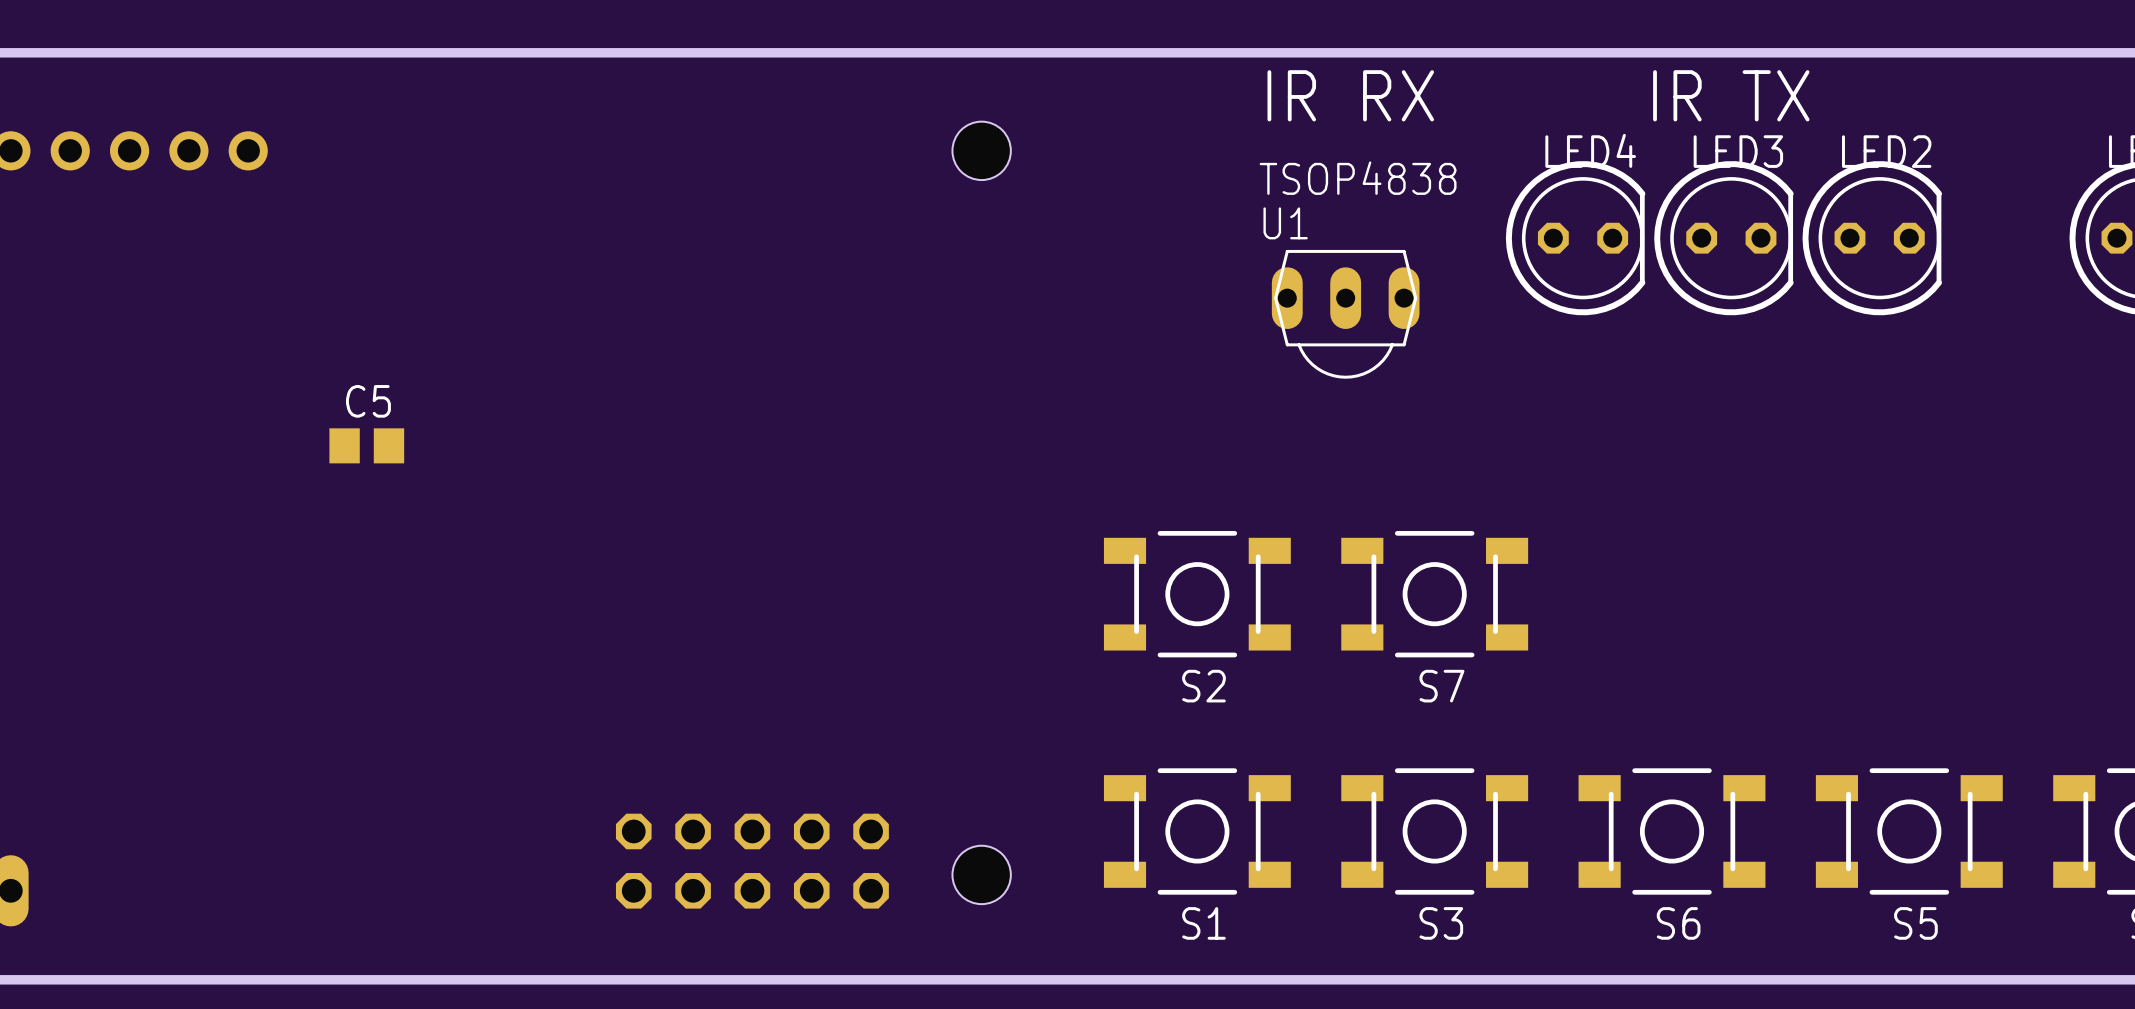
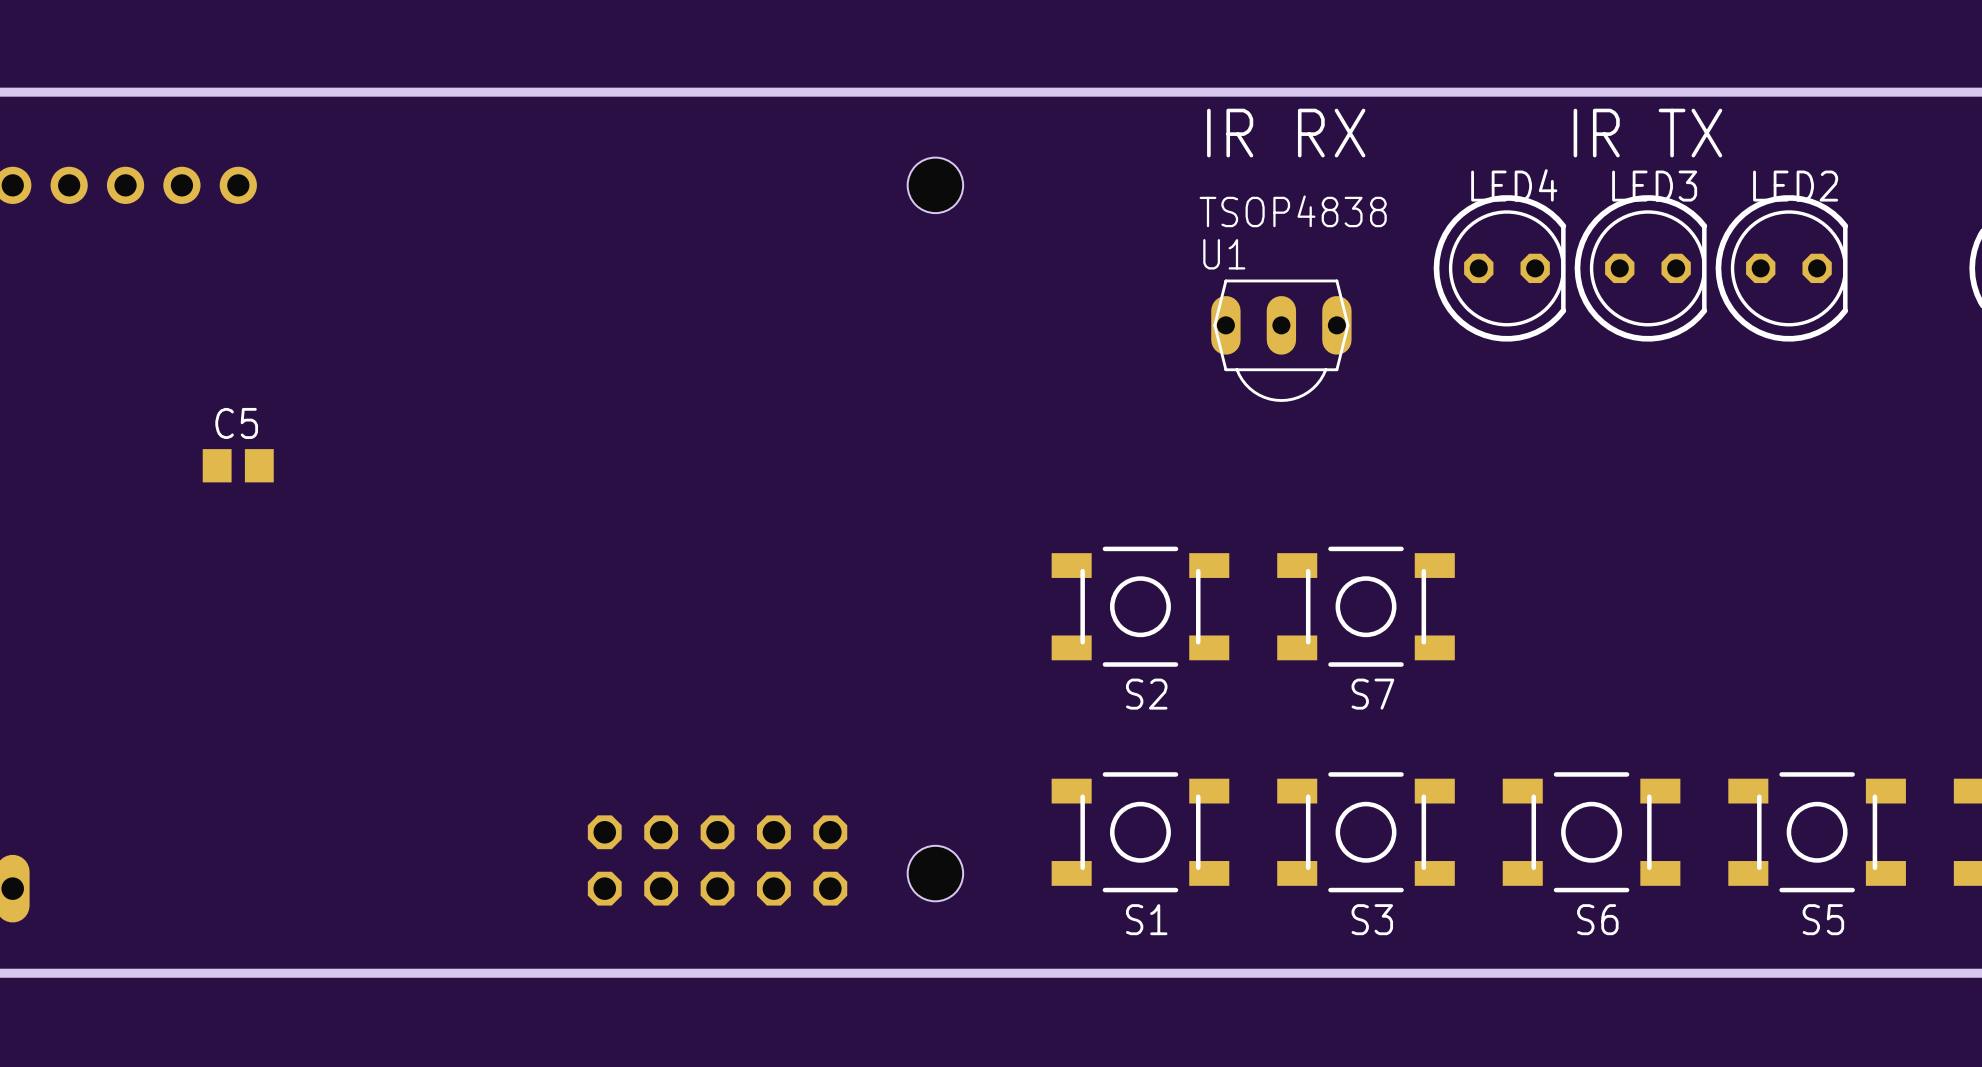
C5 name position: C5 (368, 401) -> C5 (236, 423)
C5 position: (366, 445) -> (238, 465)

